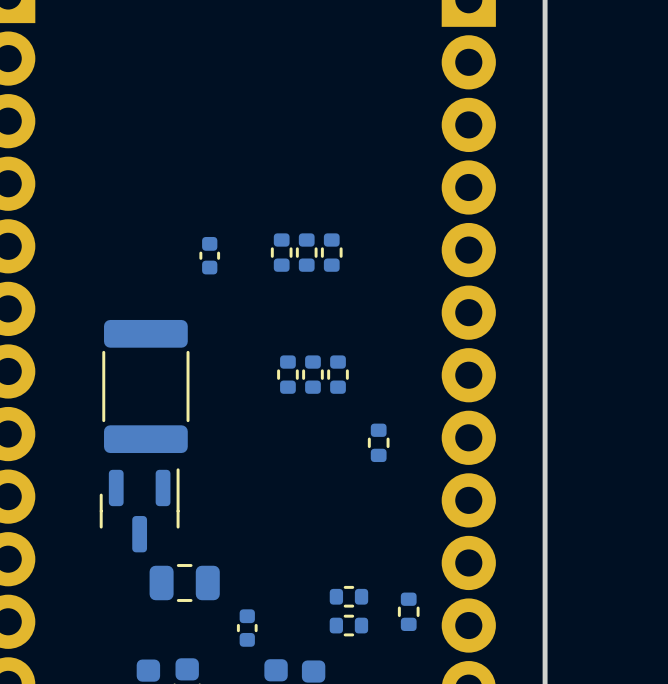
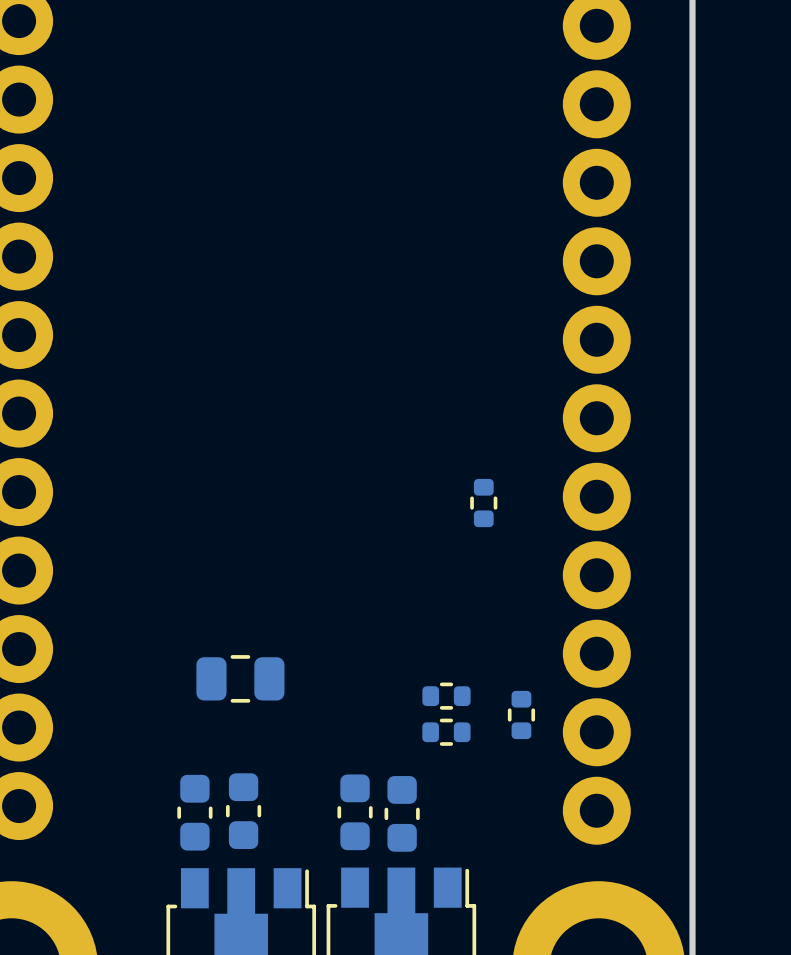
part: (281, 252) -> none
part: (306, 252) -> none
part: (331, 252) -> none
part: (209, 255) -> none
part: (287, 374) -> none
part: (312, 374) -> none
part: (338, 374) -> none
part: (145, 386) -> none
part: (139, 510) -> none
part: (247, 628) -> none

